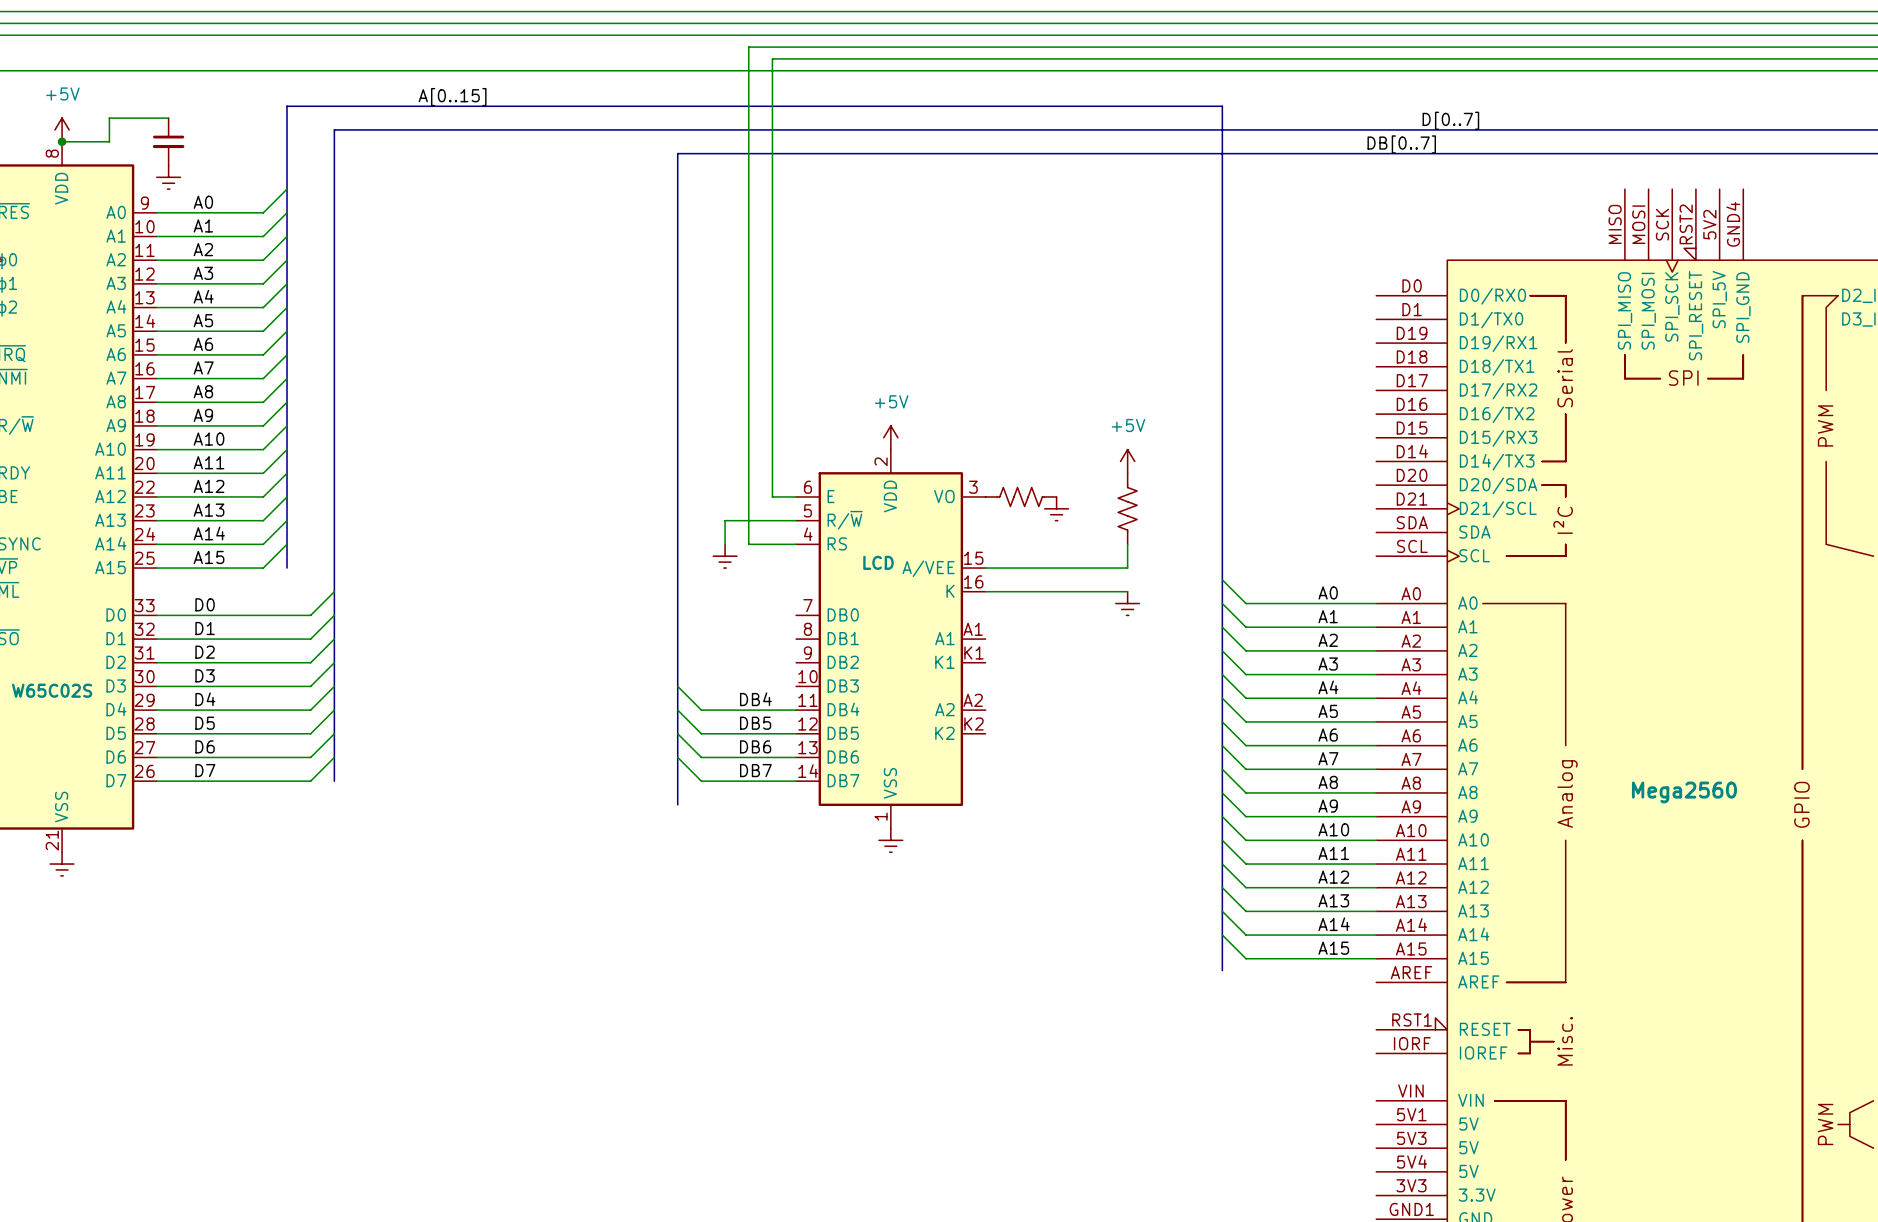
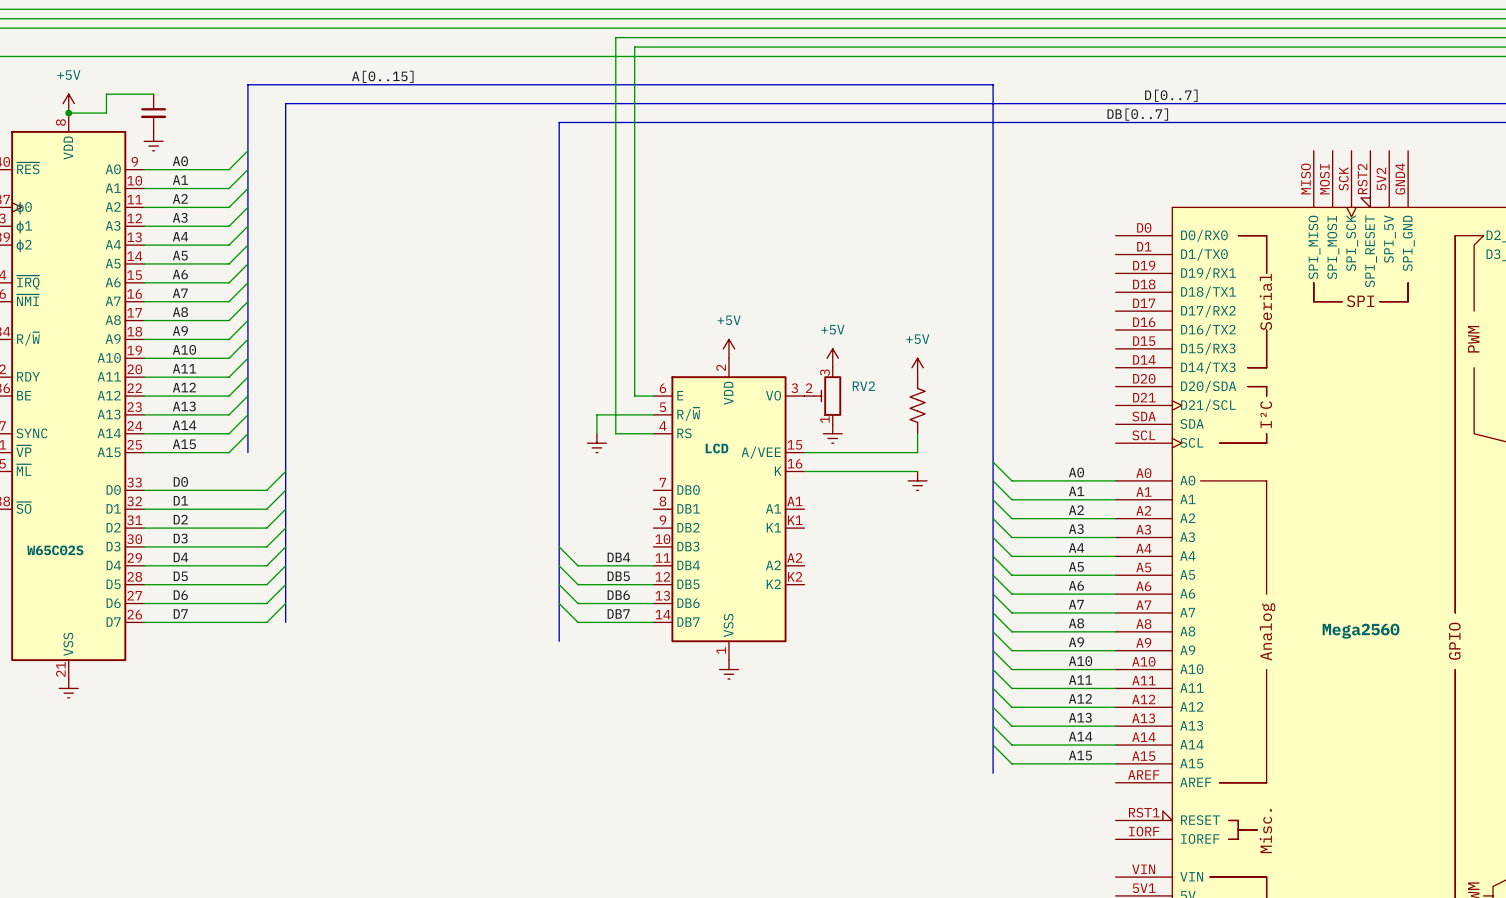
power symbol: none -> +5V (832, 358)
RV2: none -> (822, 396)
part: (1021, 496) -> none
power symbol position: (1056, 508) -> (832, 433)

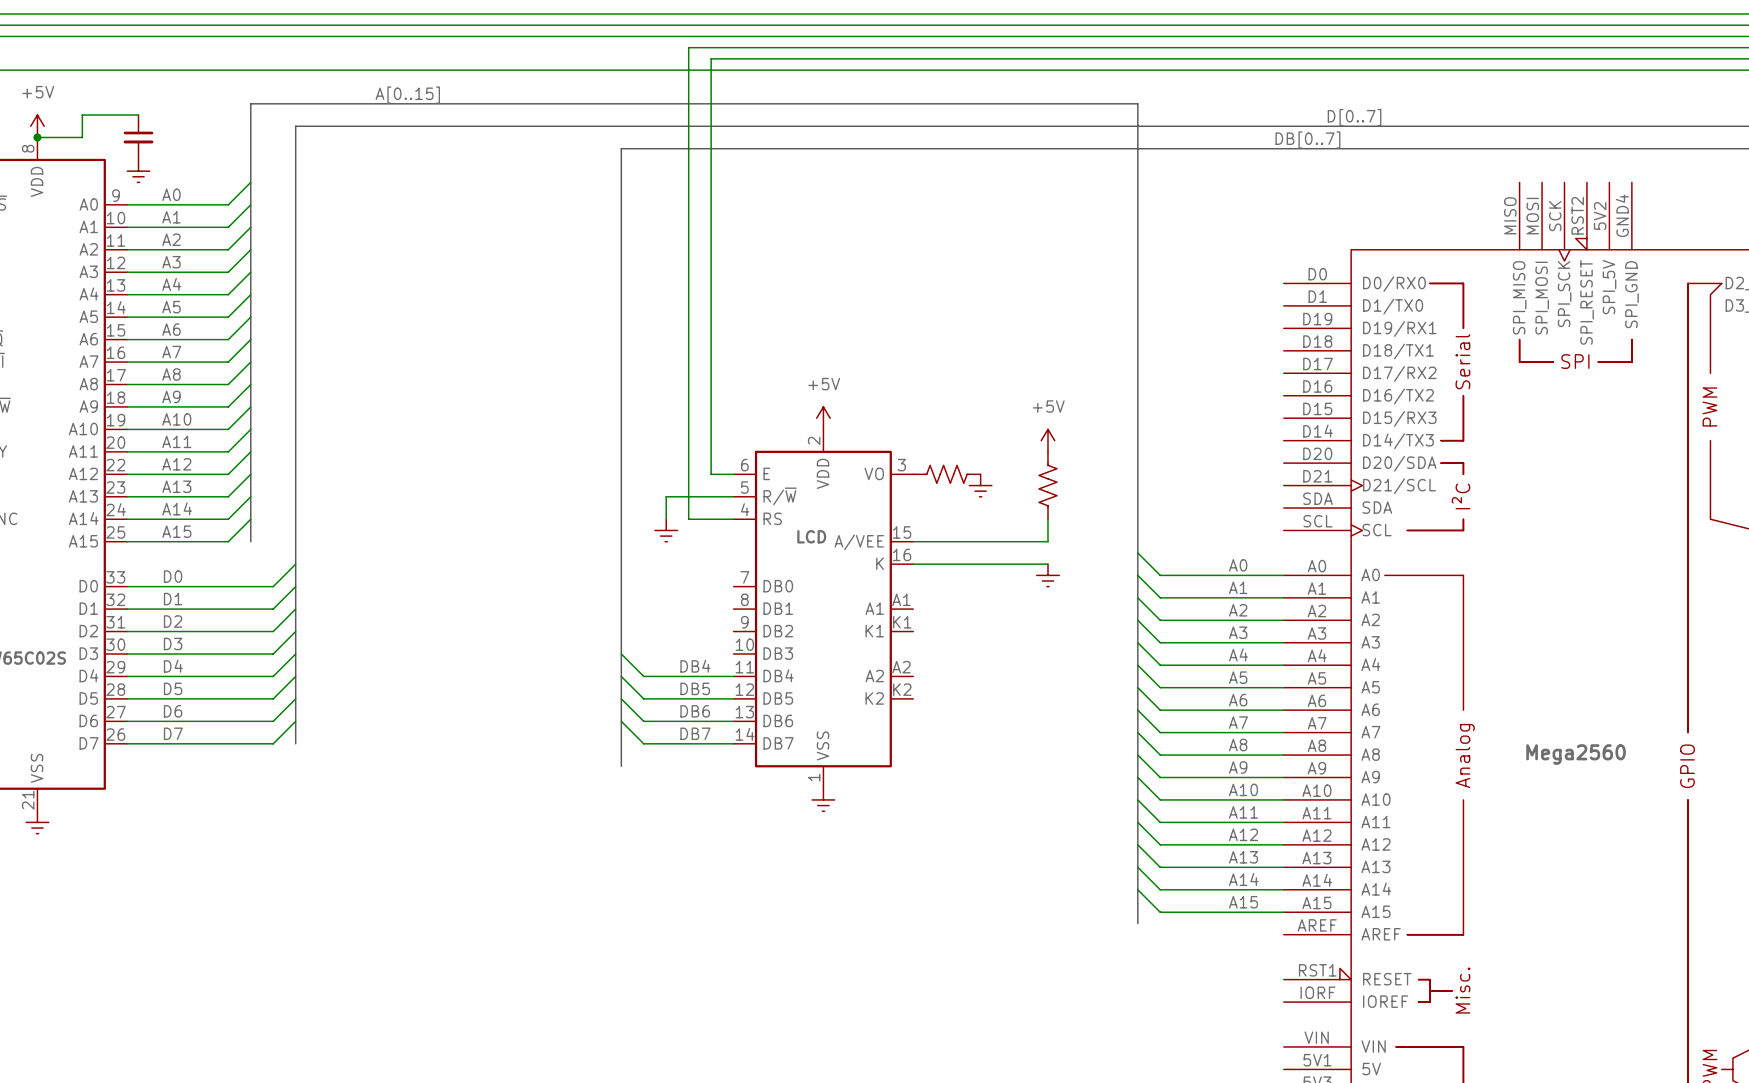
power symbol: +5V (832, 358) -> none
RV2: (822, 396) -> none
part: none -> (946, 474)
power symbol position: (832, 433) -> (980, 485)

